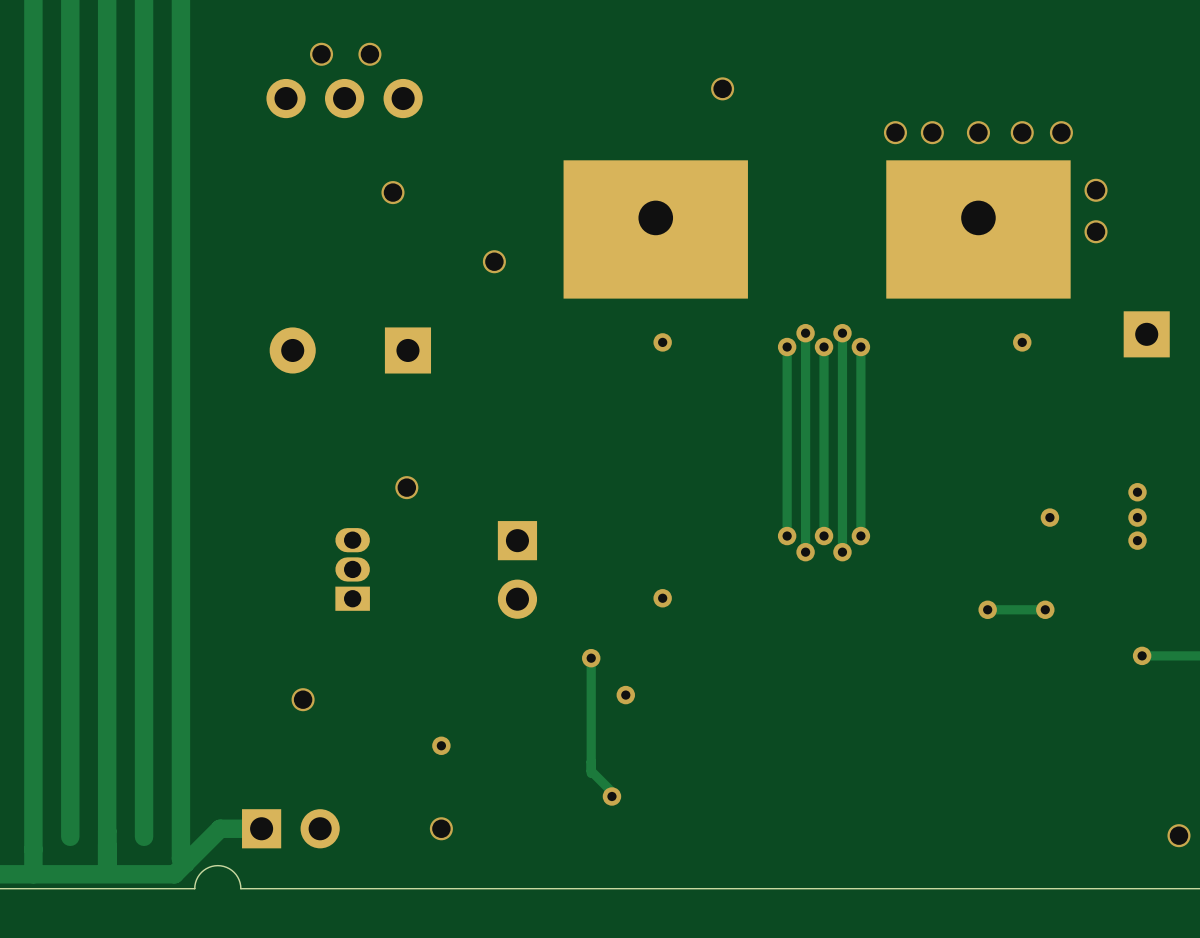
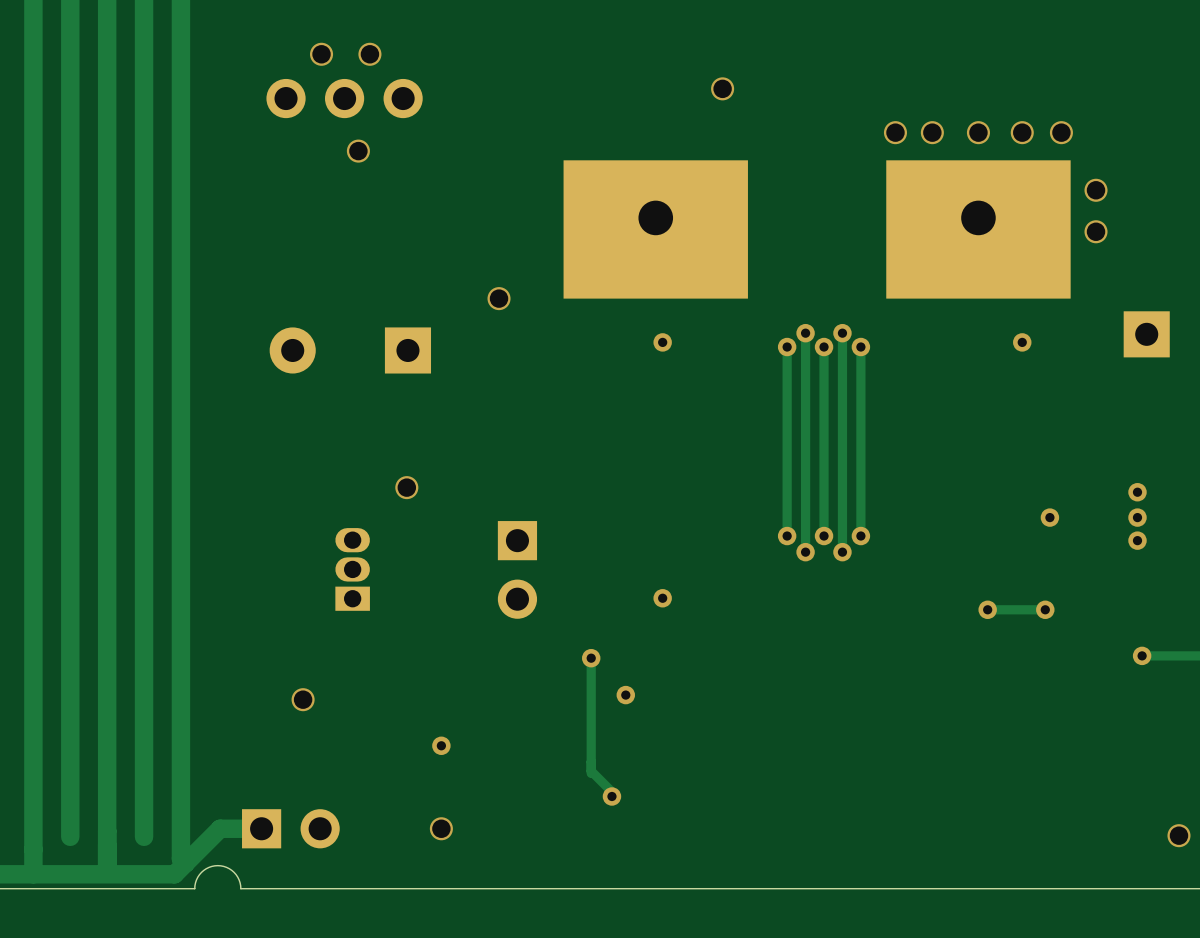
via position: (392, 192) -> (358, 151)
via position: (494, 261) -> (499, 298)

